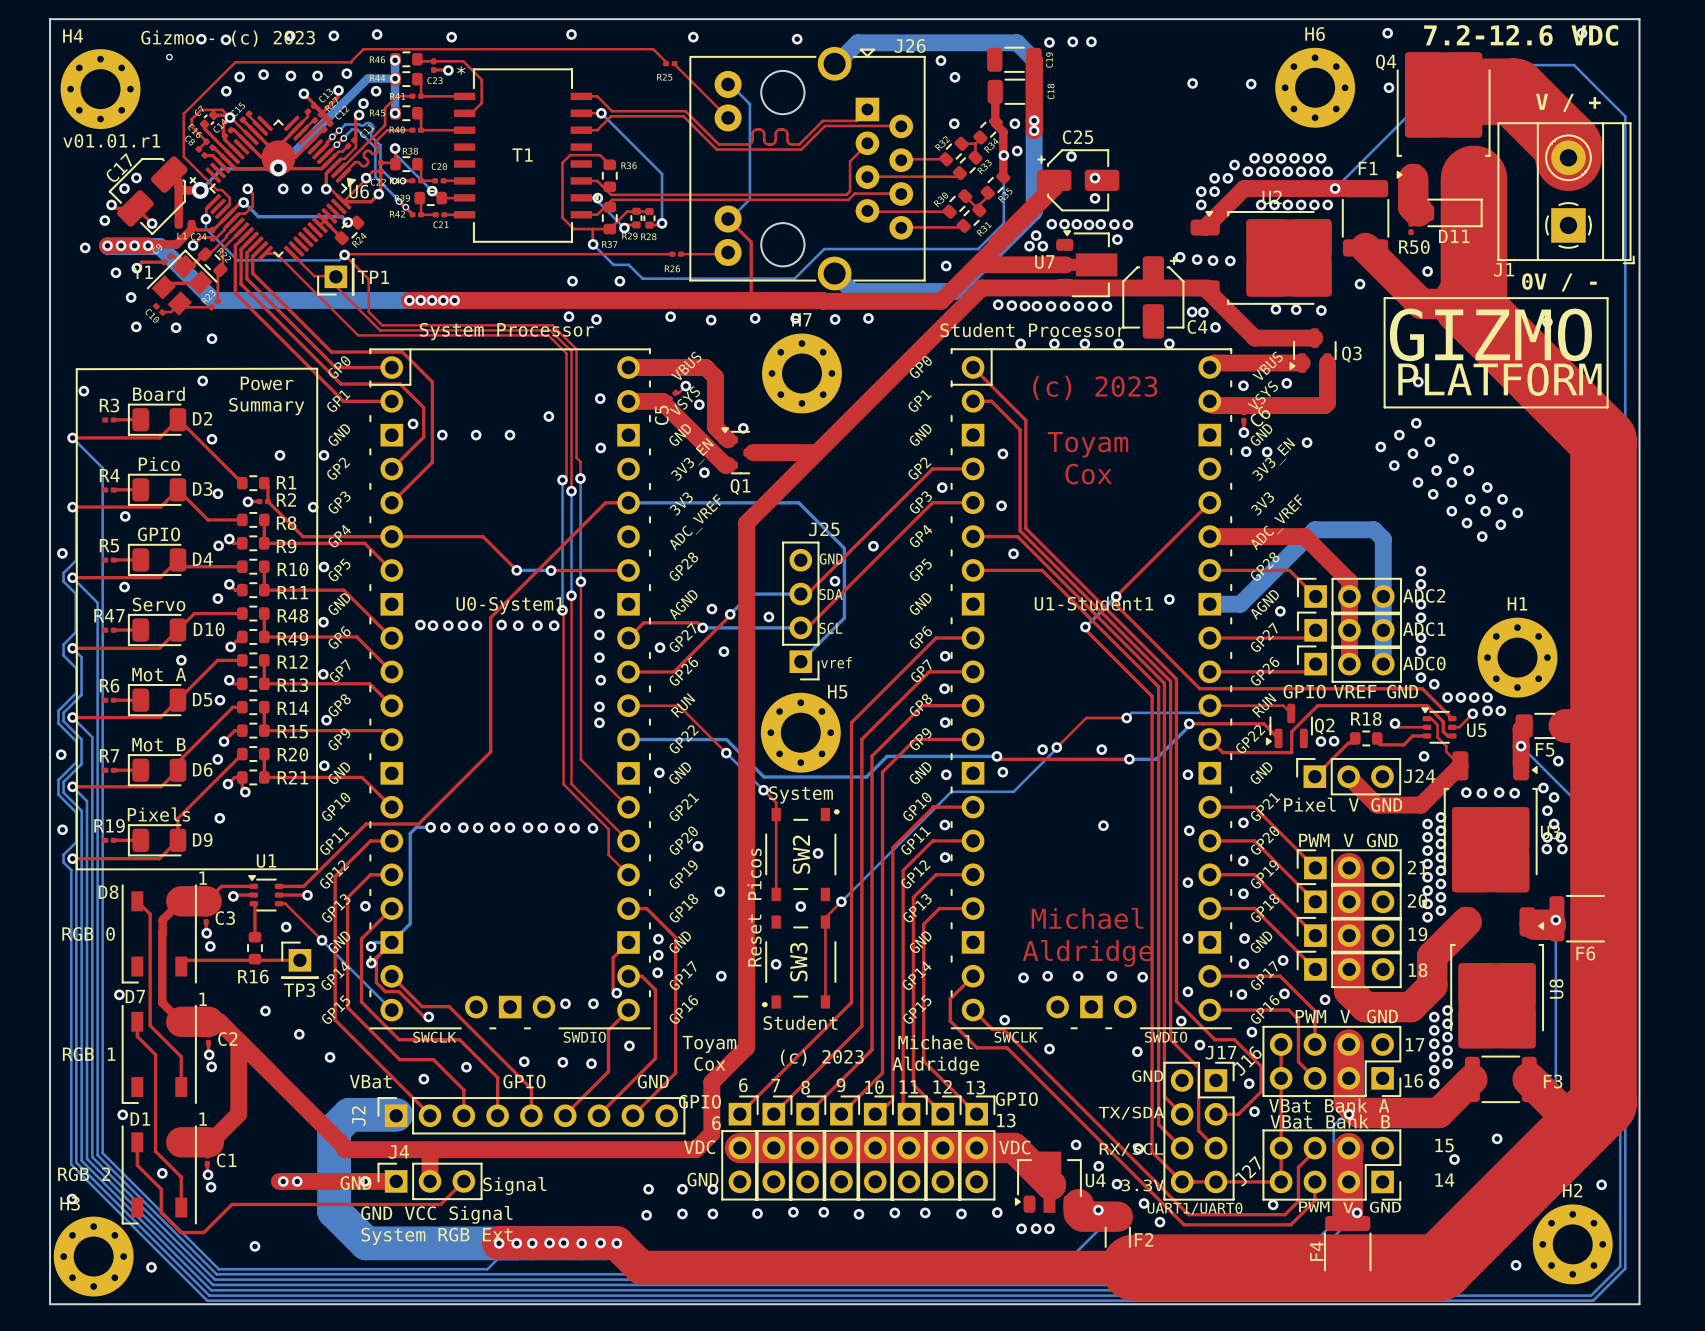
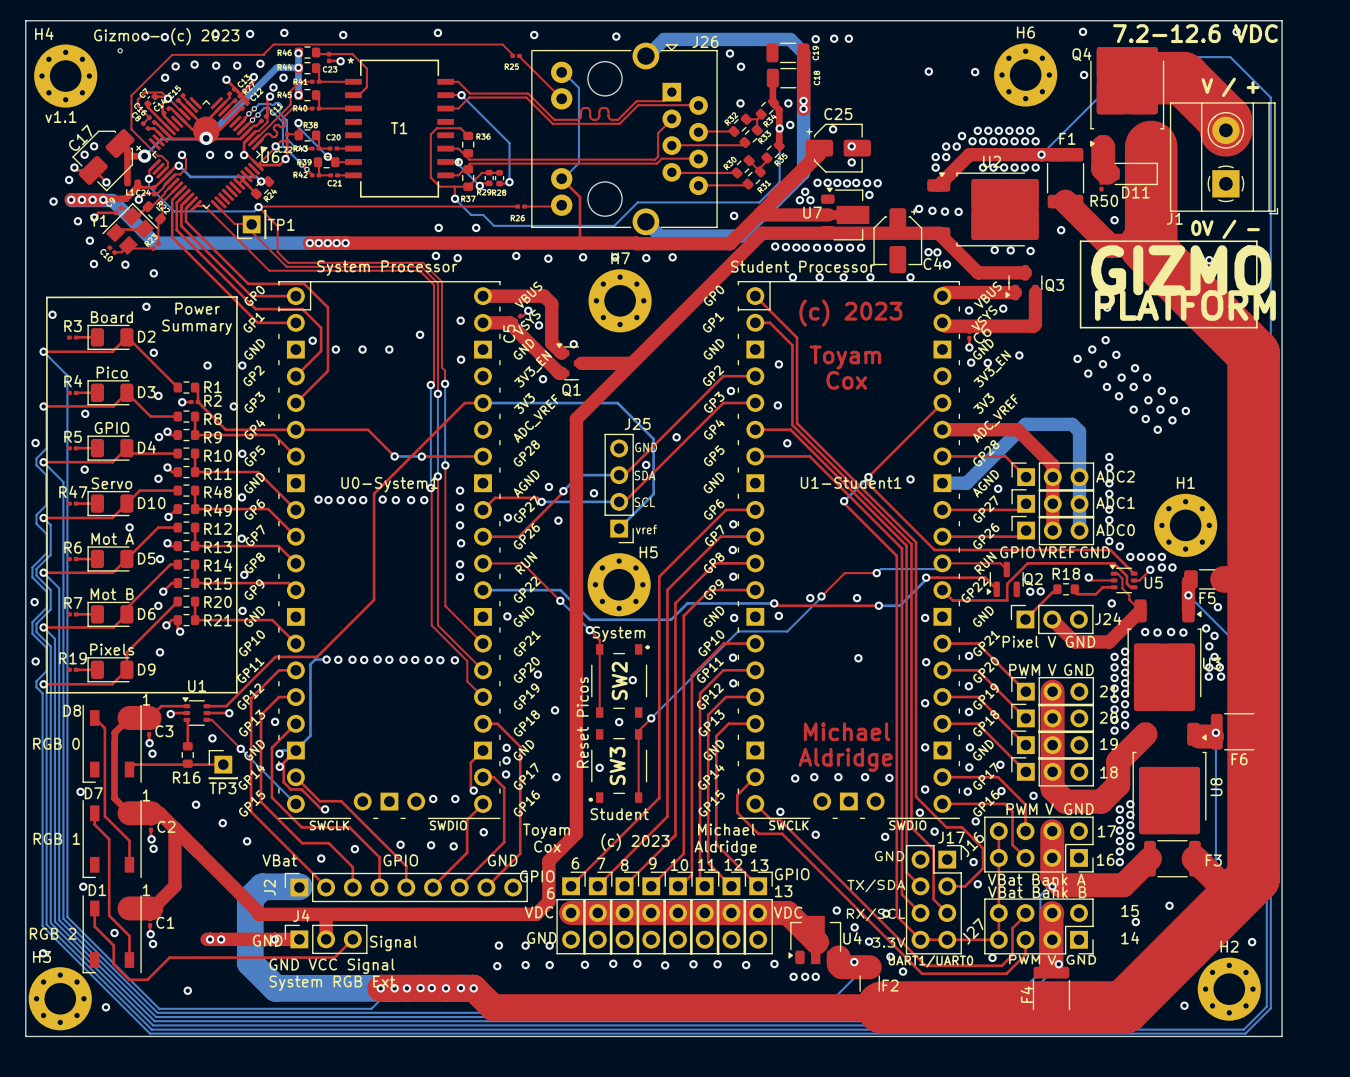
text: v01.01.r1 (111, 140) -> v1.1 (60, 116)

